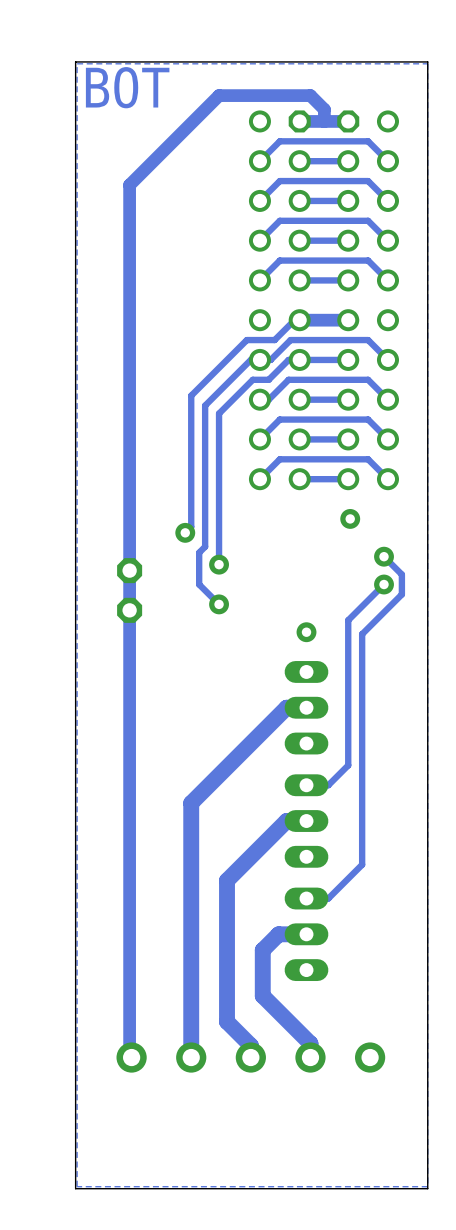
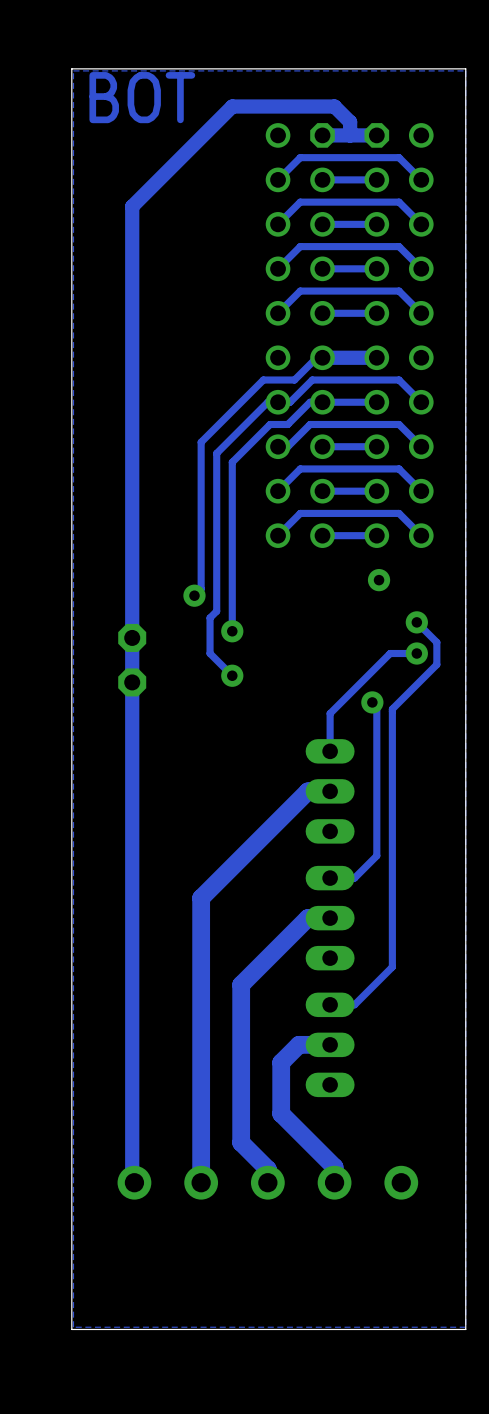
track: (384, 584) (348, 620) (348, 632) -> (416, 653) (390, 653) (330, 713) (330, 751)
via position: (306, 632) -> (372, 702)

